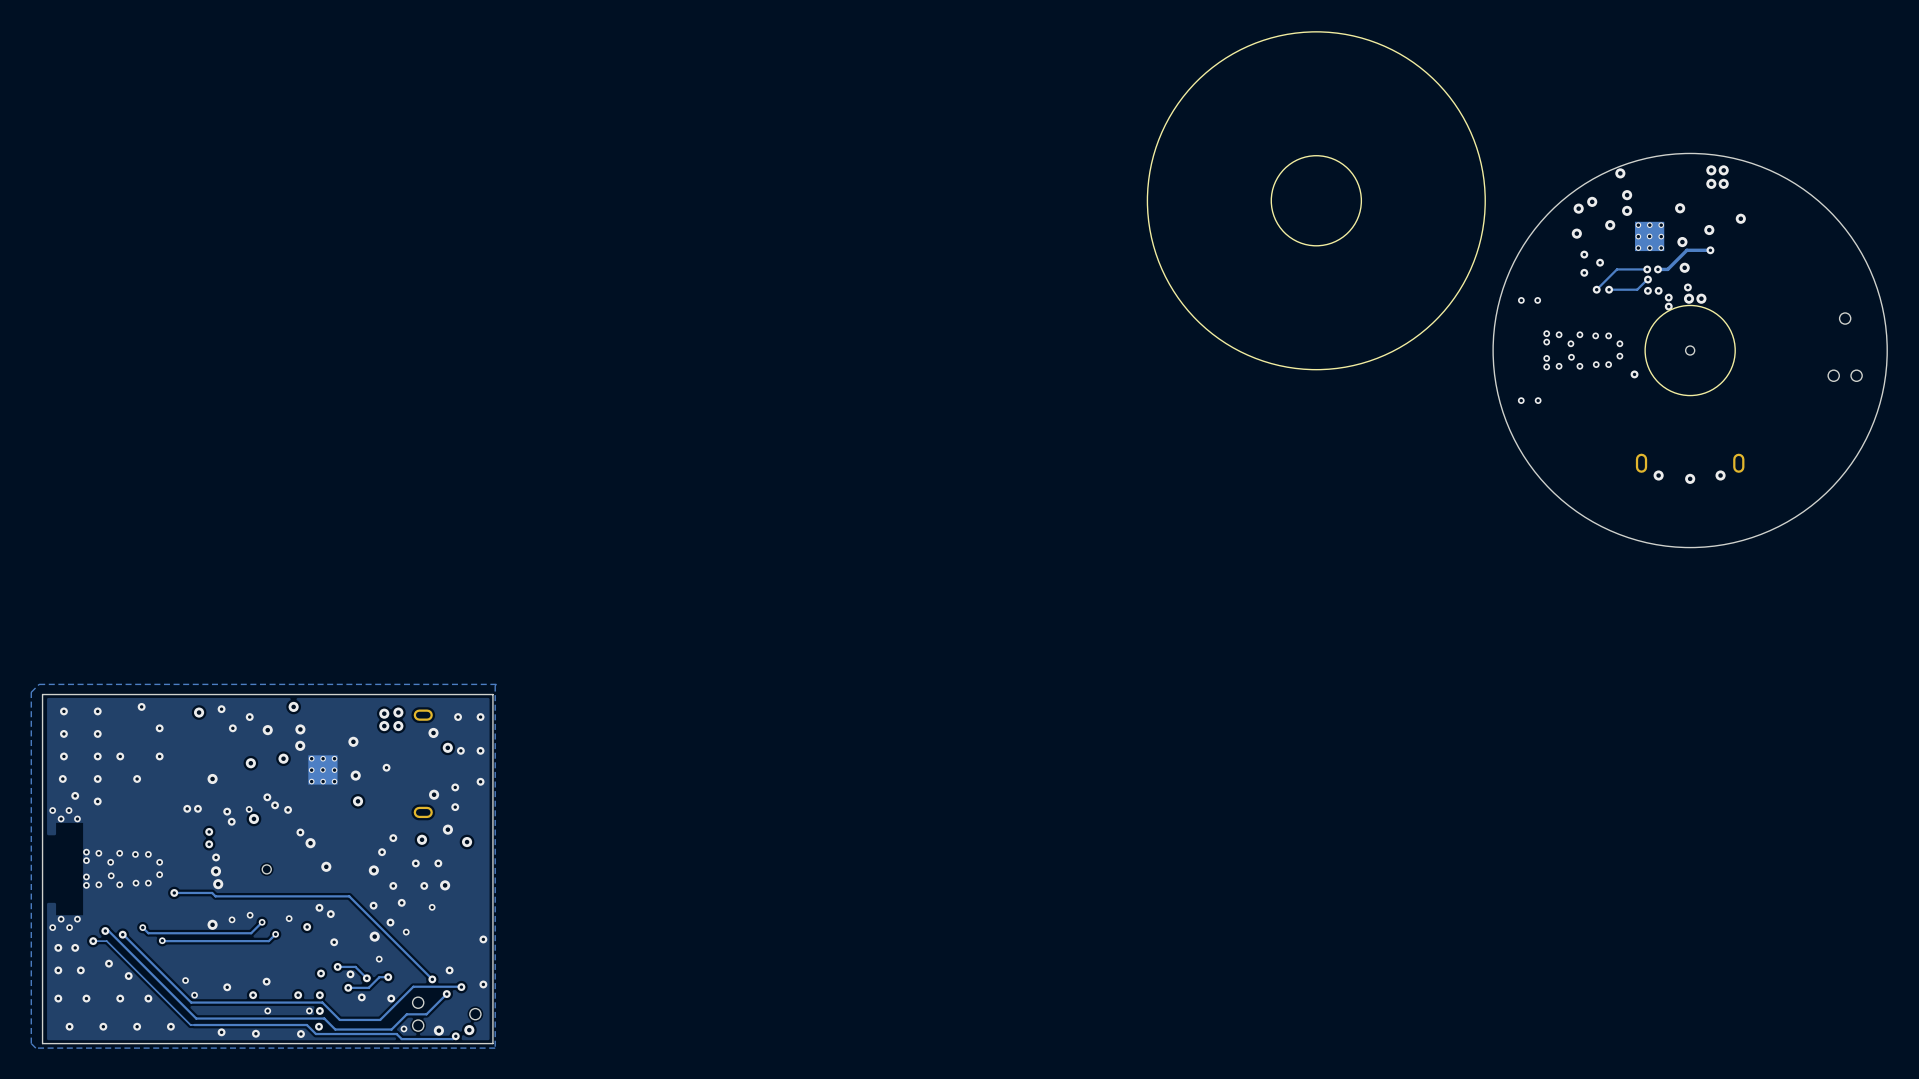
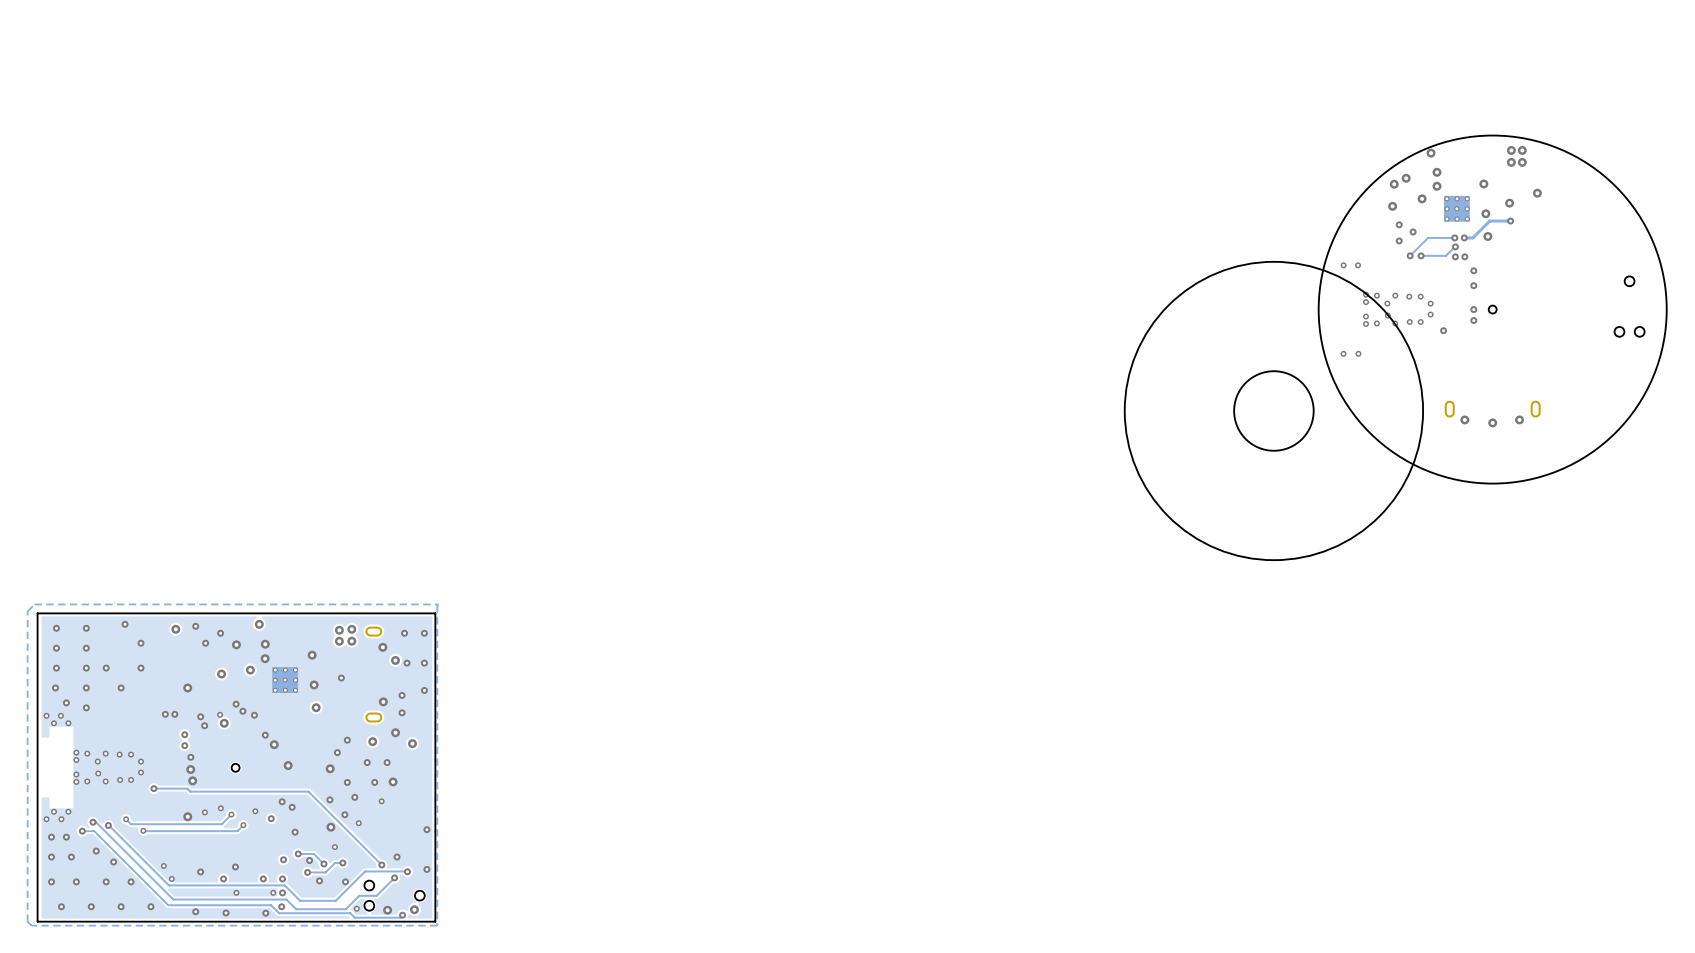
drawing: [1146, 31, 1486, 371] -> none
via: (1687, 287) -> none
drawing: none -> [1124, 261, 1424, 561]
via: (1668, 297) -> none
via: (1689, 298) -> none
via: (1701, 298) -> none
drawing: [1644, 304, 1736, 397] -> none
via: none -> (1473, 285)
via: none -> (1473, 309)
via: none -> (1473, 320)

